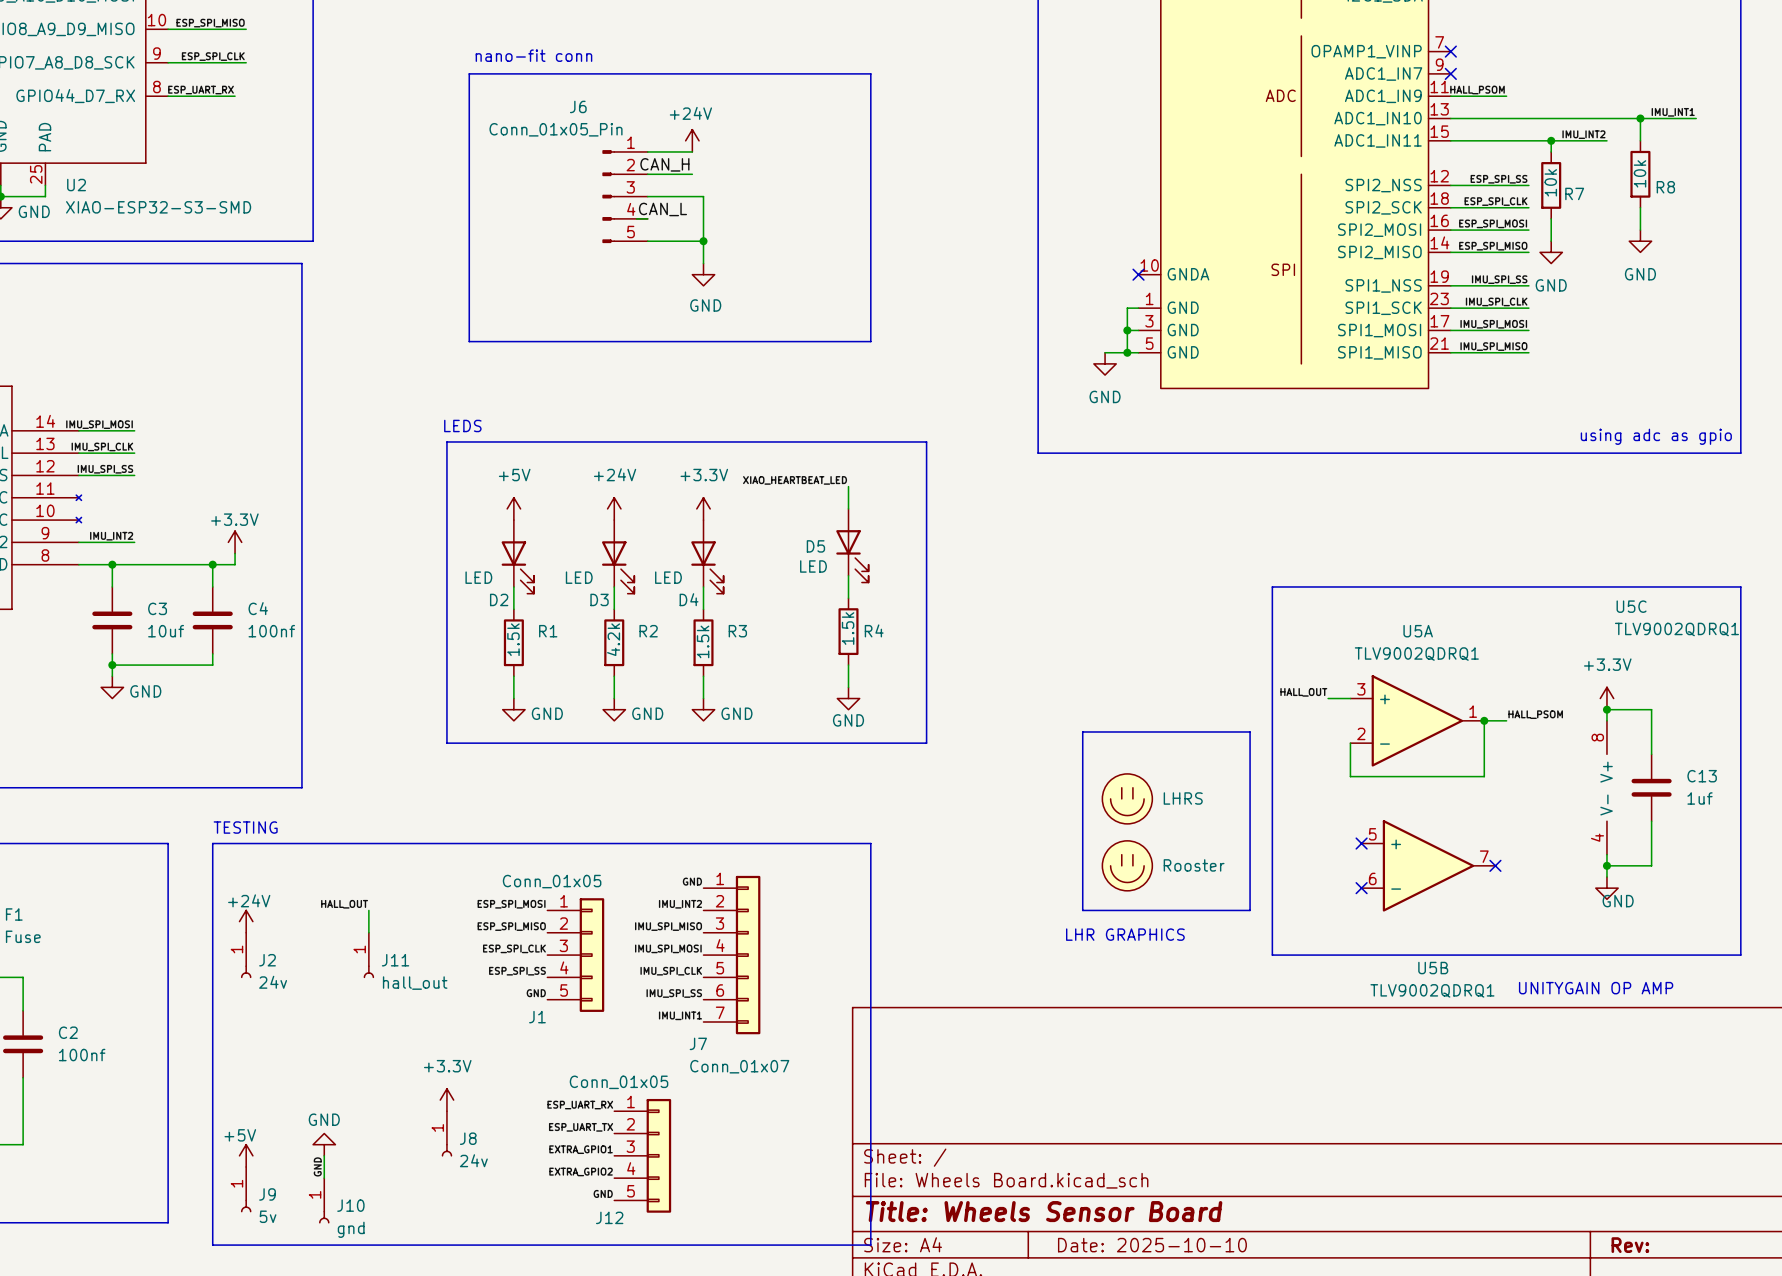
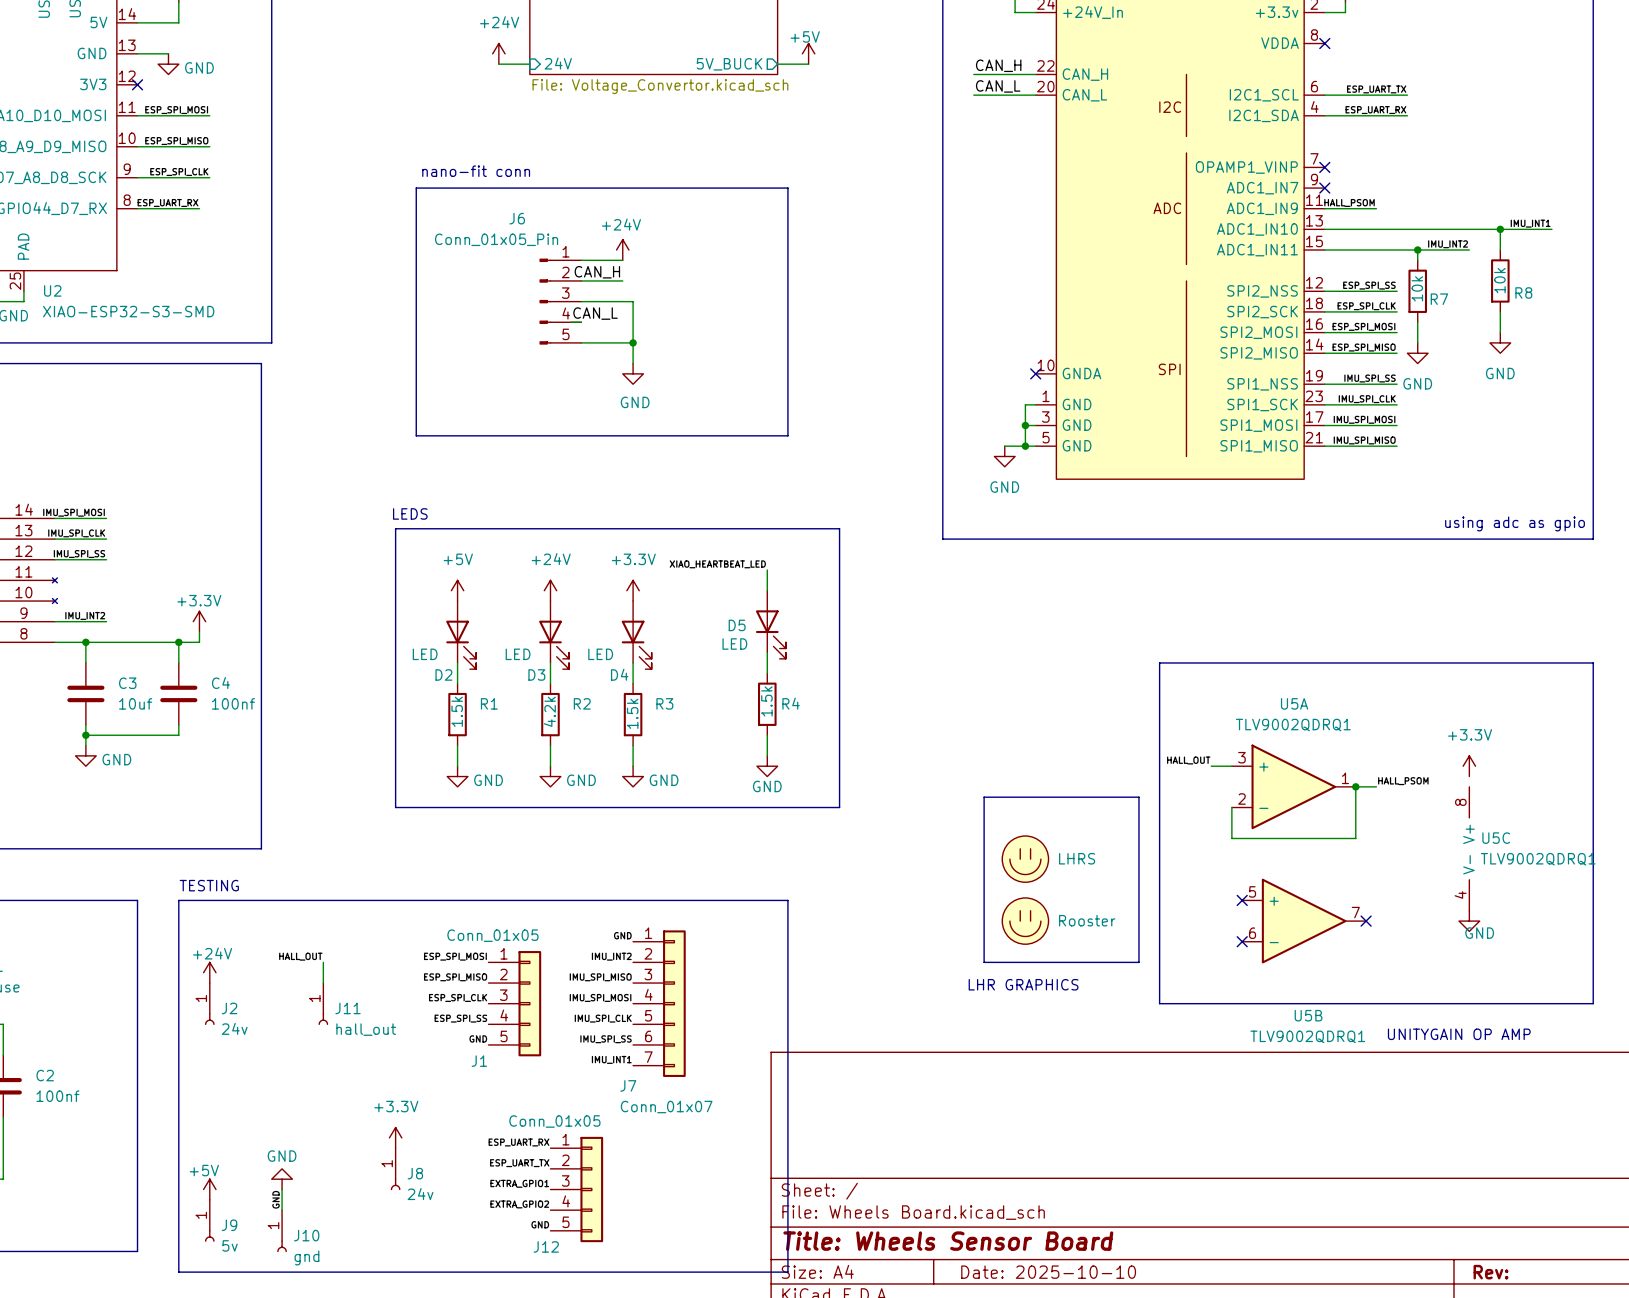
U5C name position: U5C (1631, 606) -> U5C (1496, 838)
U5C value position: TLV9002QDRQ1 (1676, 629) -> TLV9002QDRQ1 (1538, 859)
junction: (1606, 709) -> none
wire: (1606, 720) (1606, 709) (1651, 709) (1651, 754) -> none
C13: 1uf (1651, 787) -> none
wire: (1651, 821) (1651, 865) (1606, 865) -> none
junction: (1606, 865) -> none
power symbol position: GND (1606, 888) -> GND (1469, 921)

